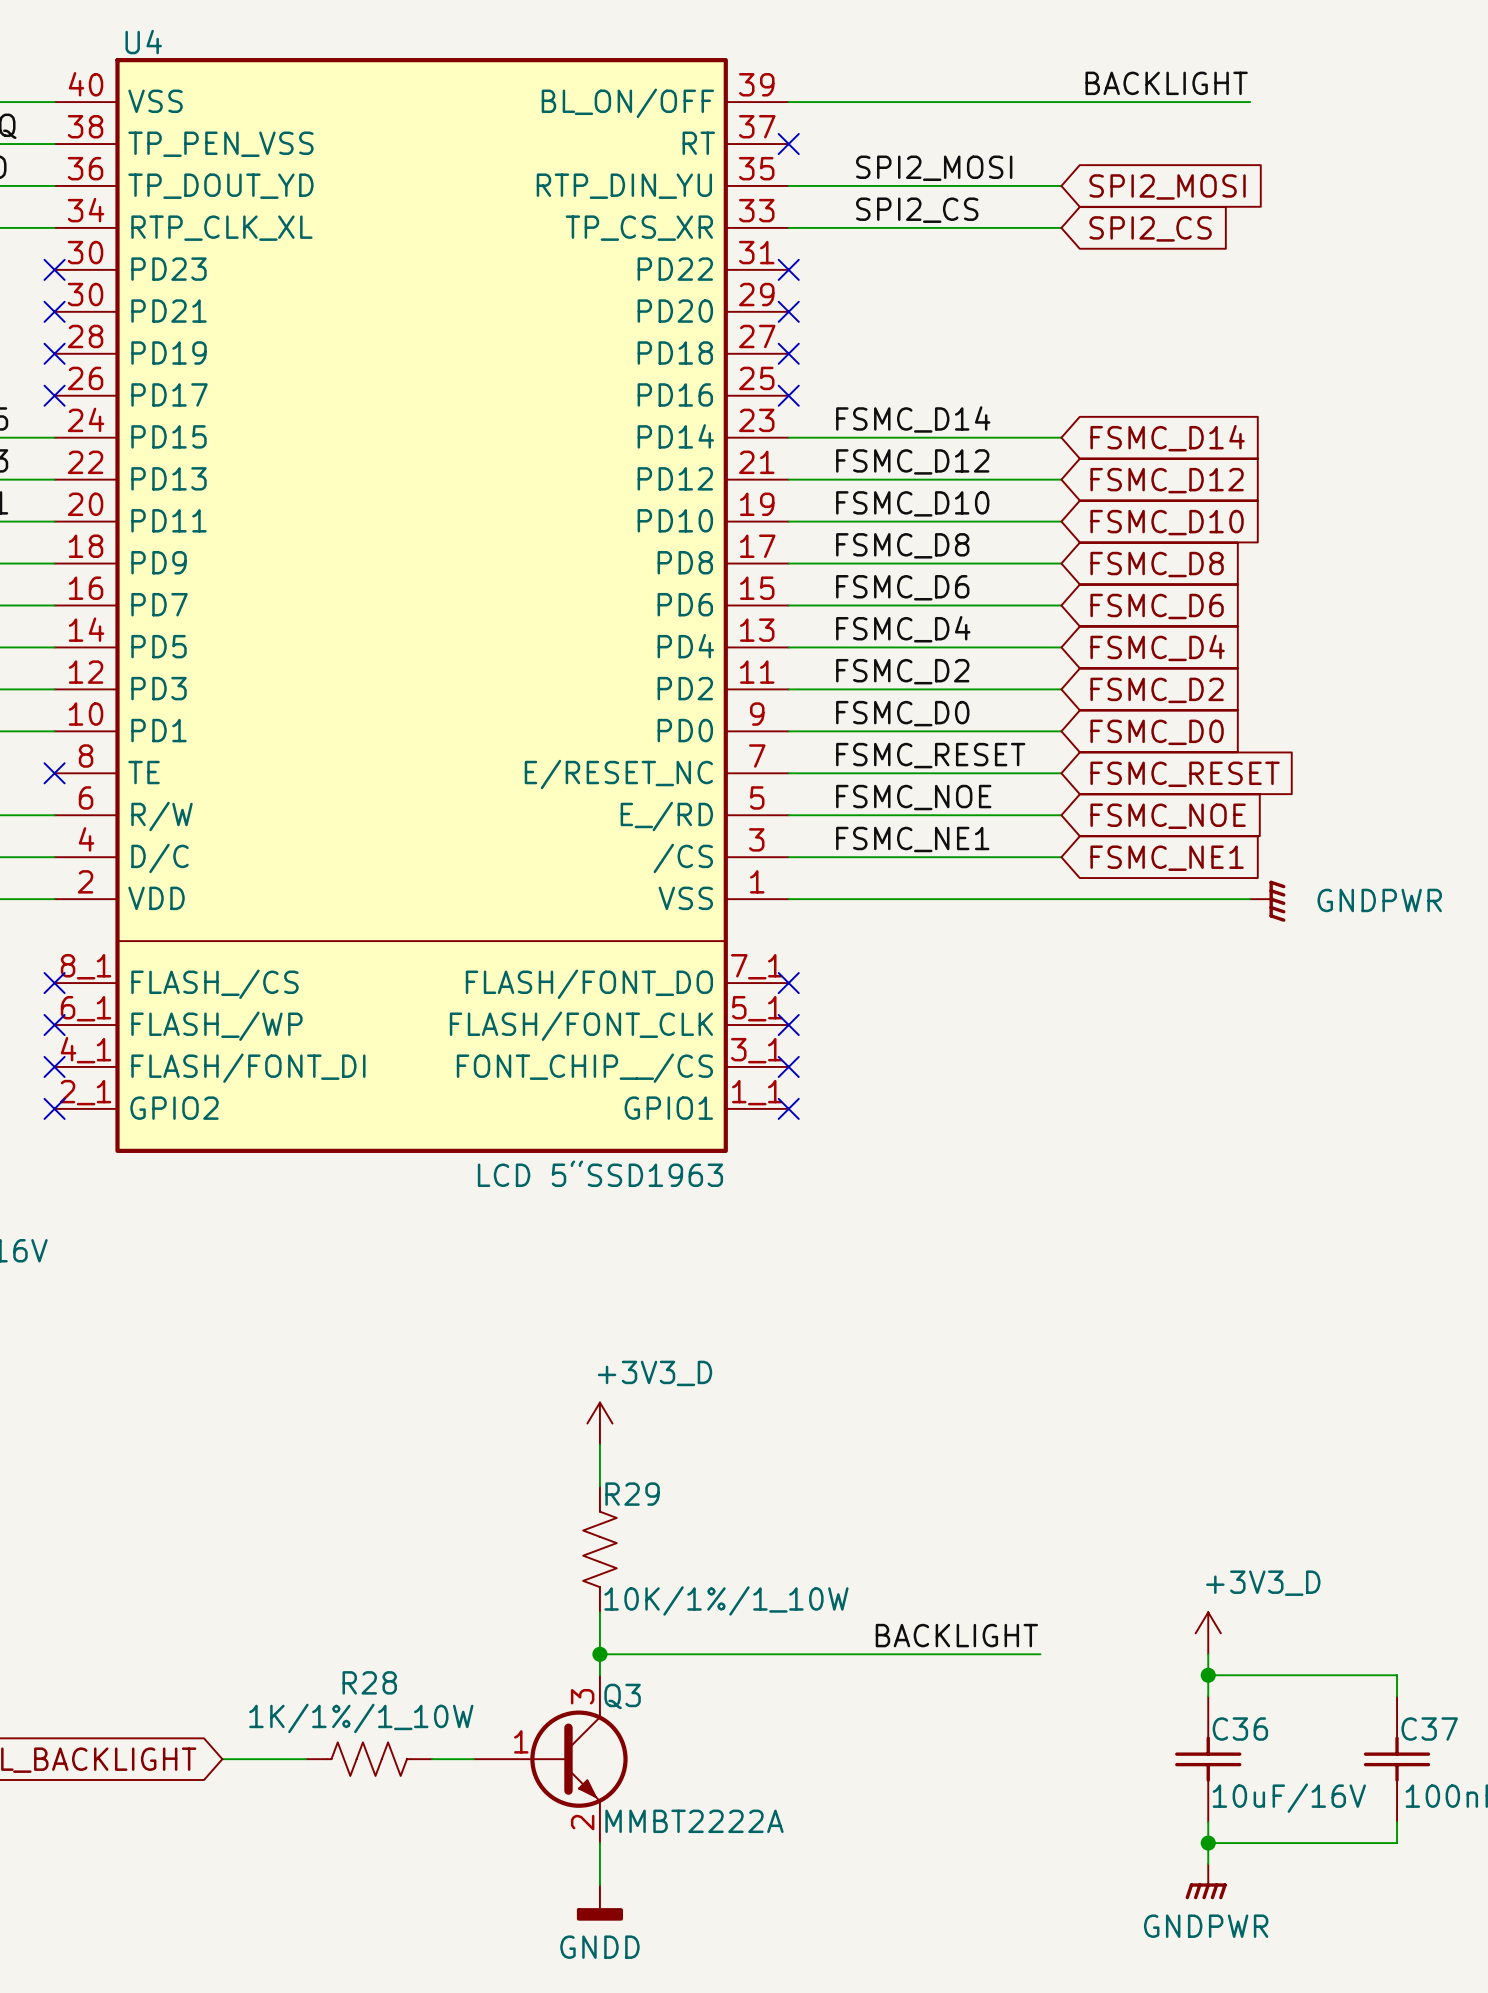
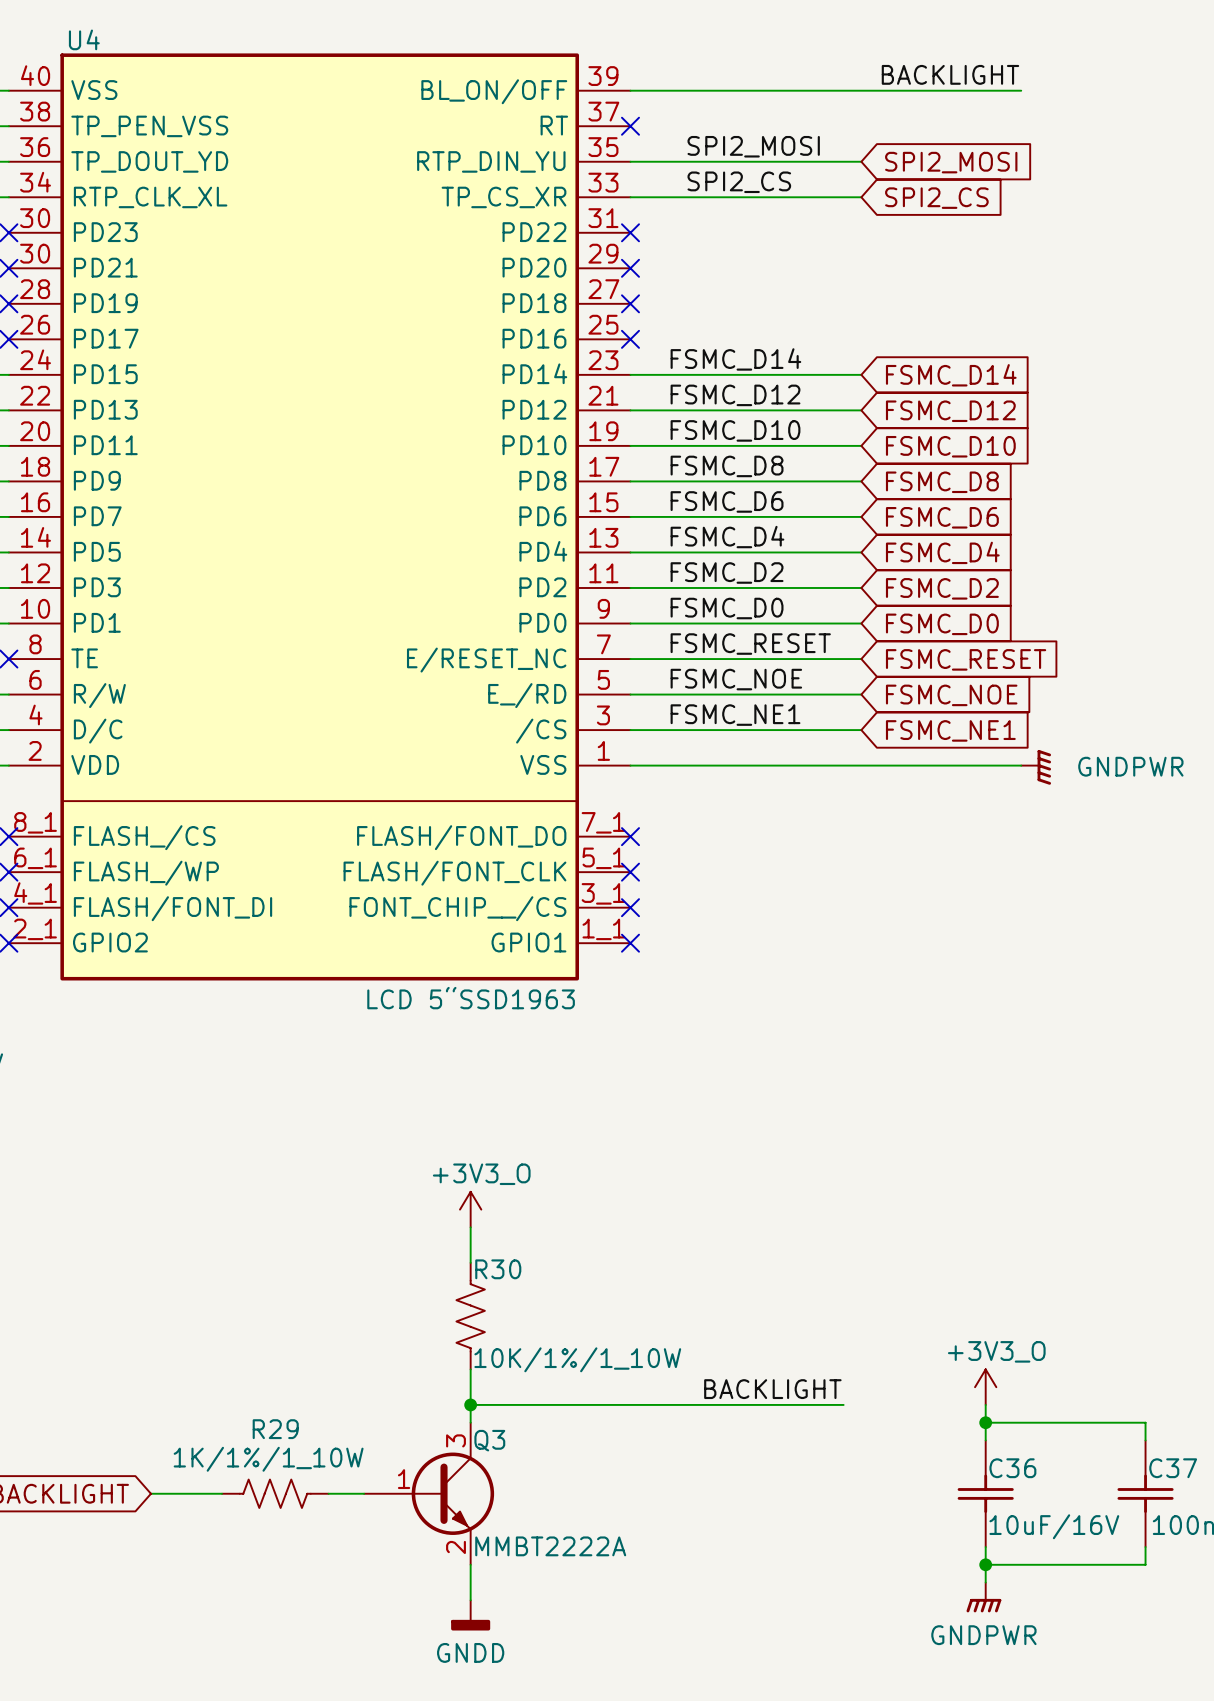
power symbol: +3V3_D (599, 1423) -> +3V3_O (470, 1209)
R29 name: R29 (632, 1494) -> R30 (498, 1269)
power symbol: +3V3_D (1208, 1633) -> +3V3_O (985, 1387)
R28 name: R28 (369, 1682) -> R29 (275, 1429)

